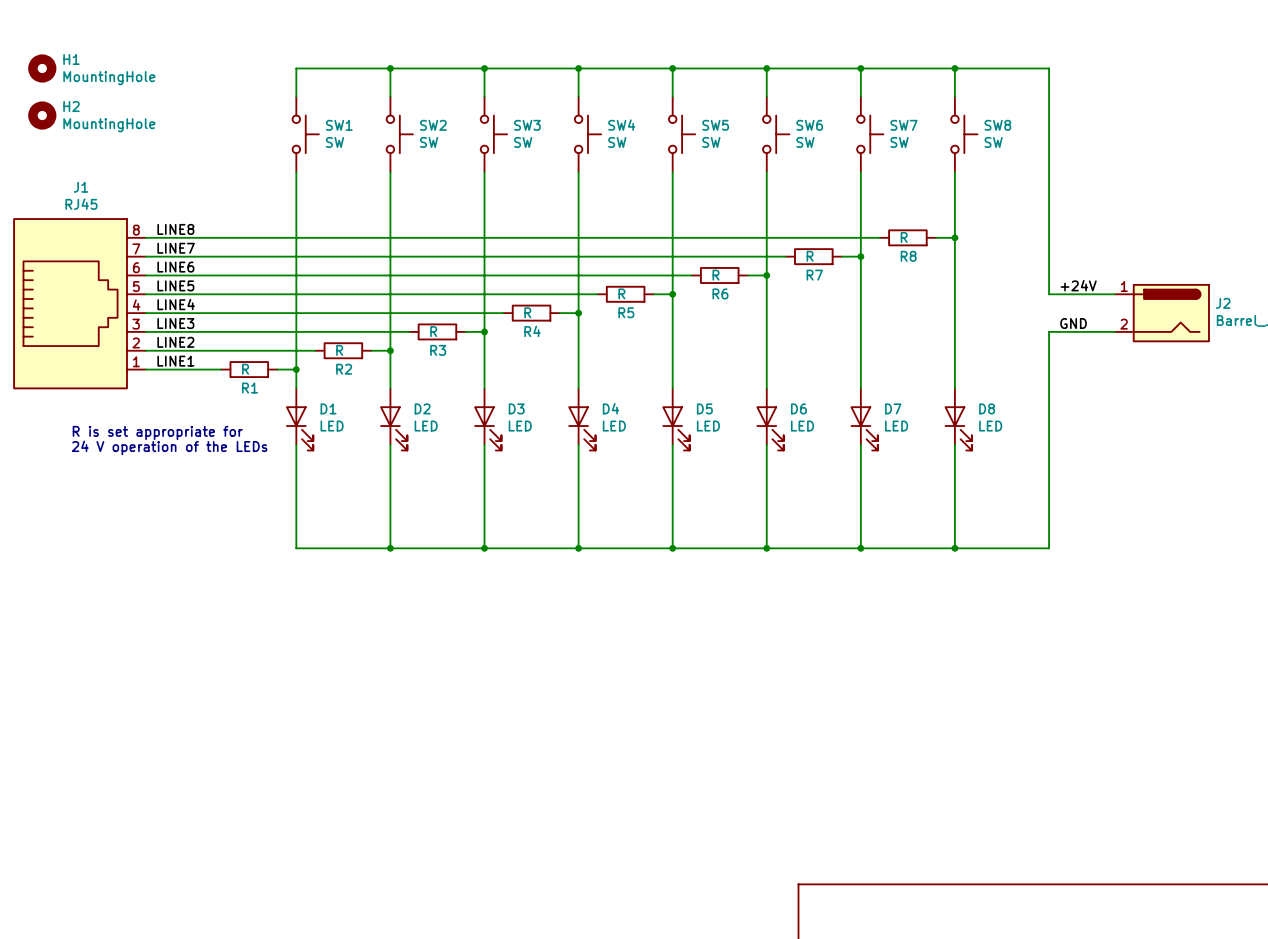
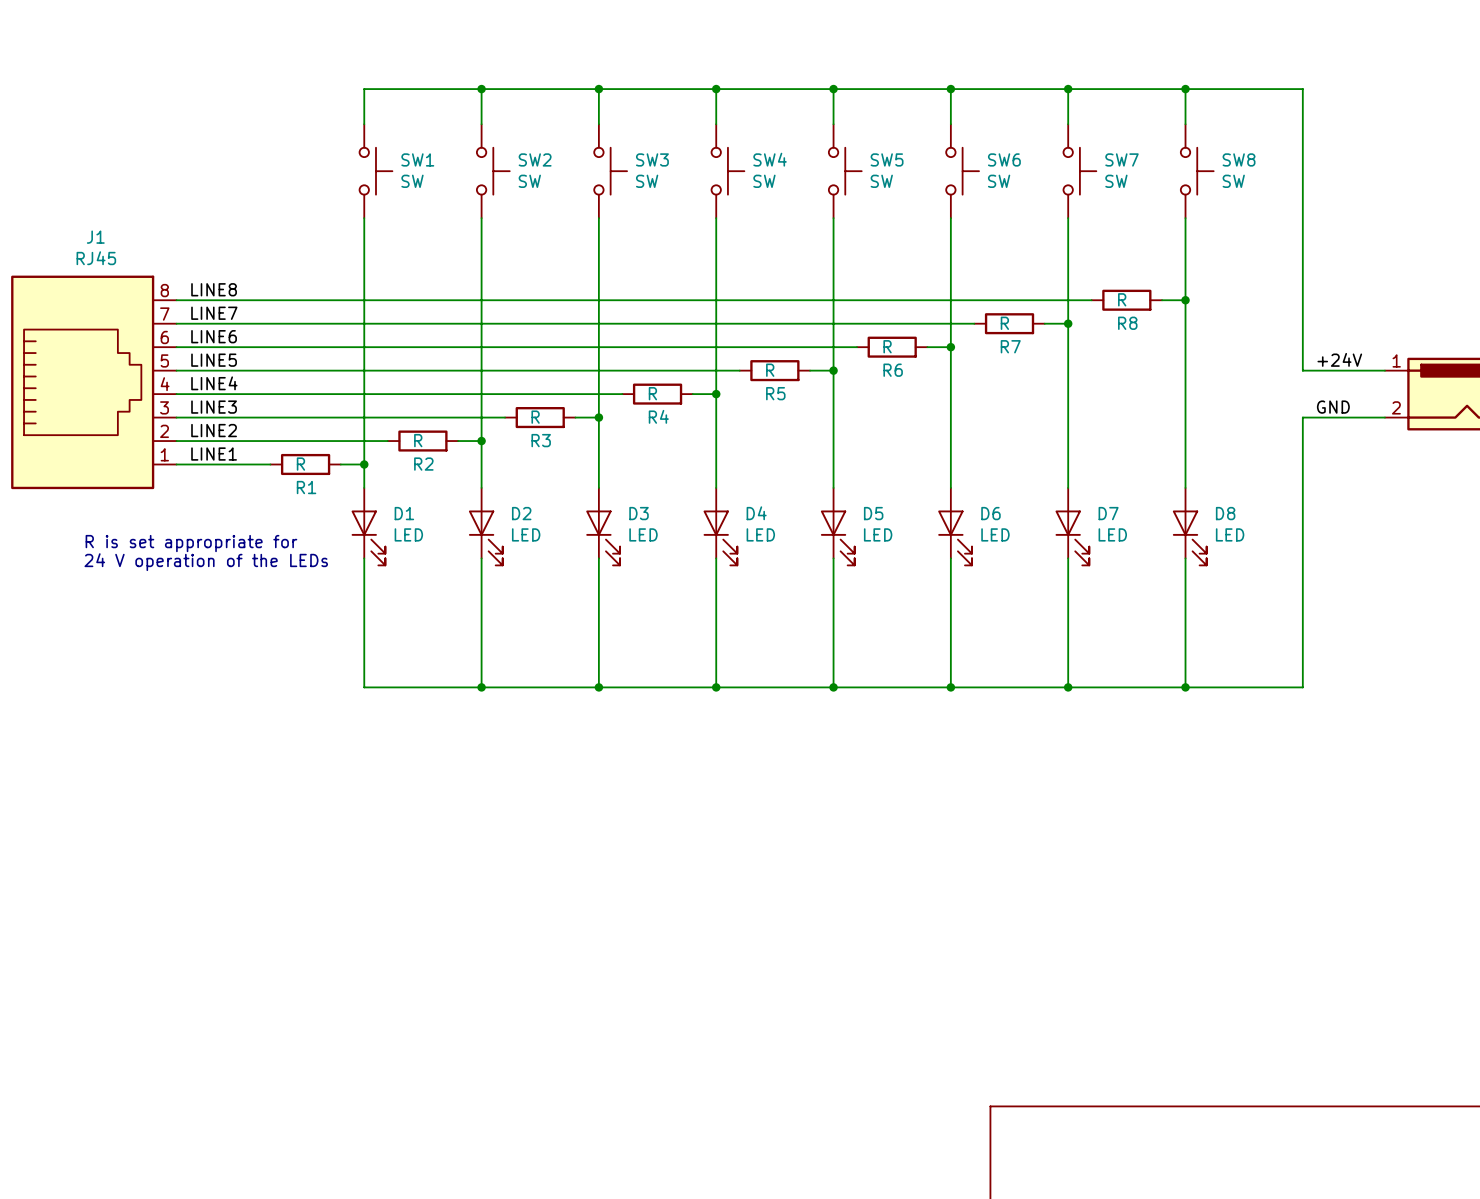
H1: MountingHole (42, 68) -> none
H2: MountingHole (42, 115) -> none

